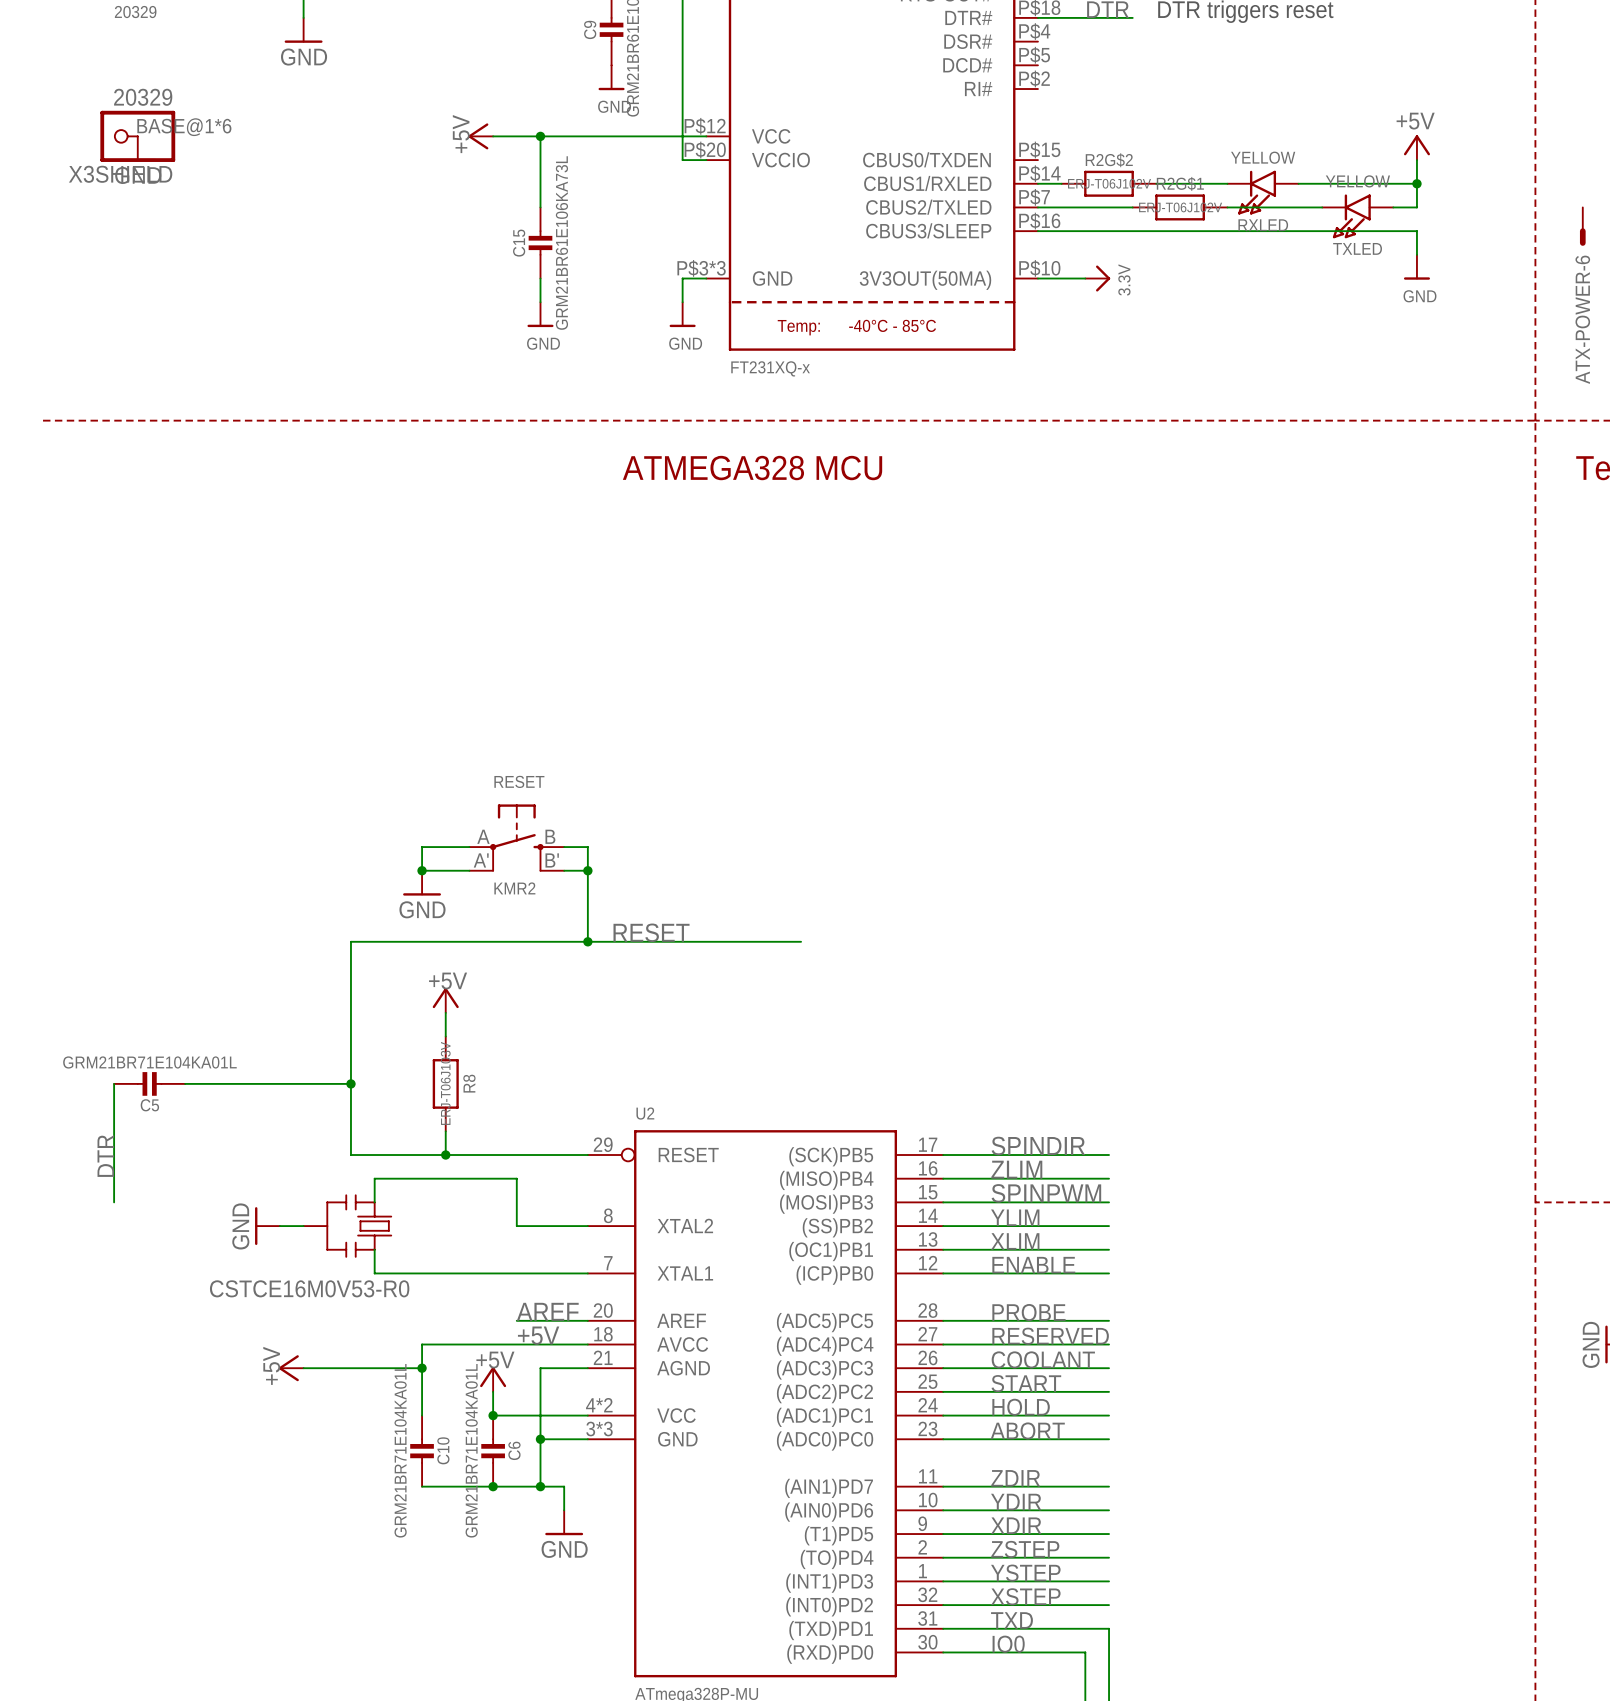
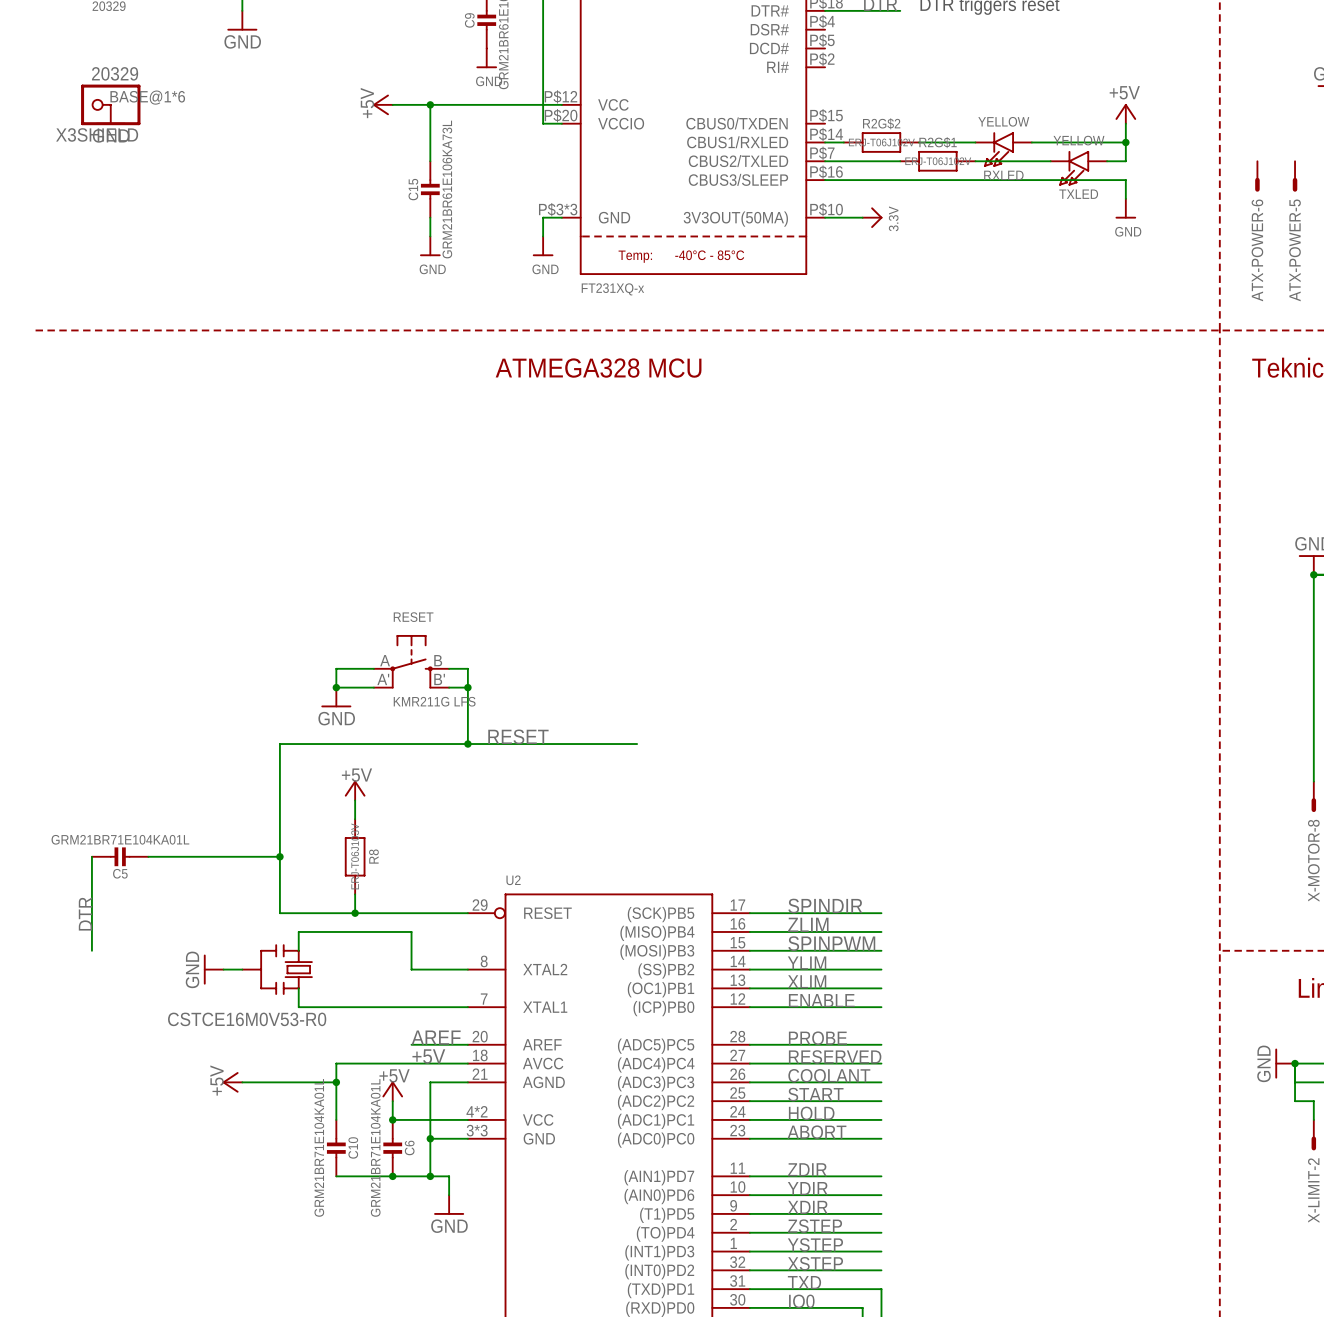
RESET value: KMR2 (514, 888) -> KMR211G LFS (434, 701)

